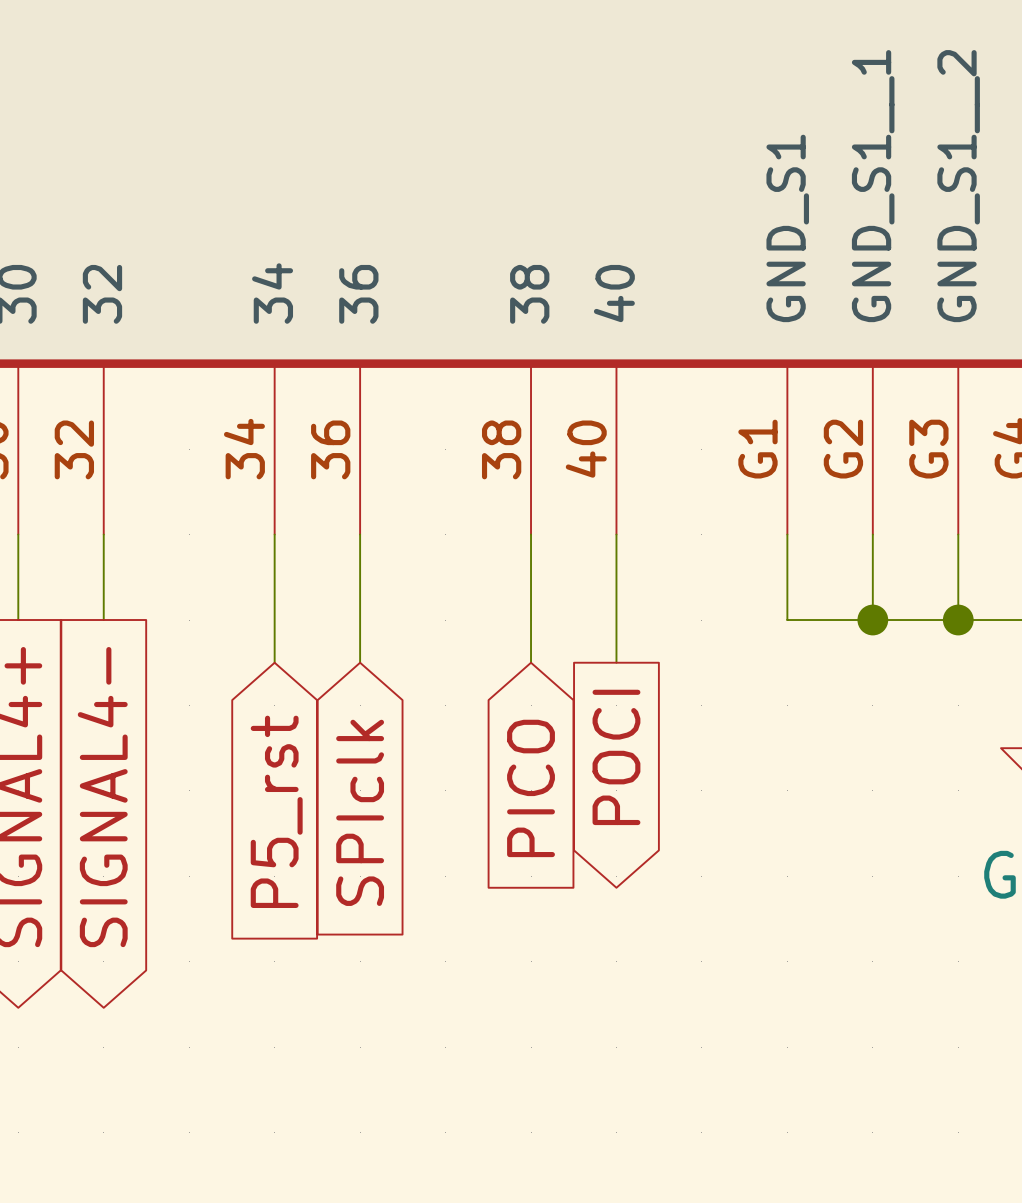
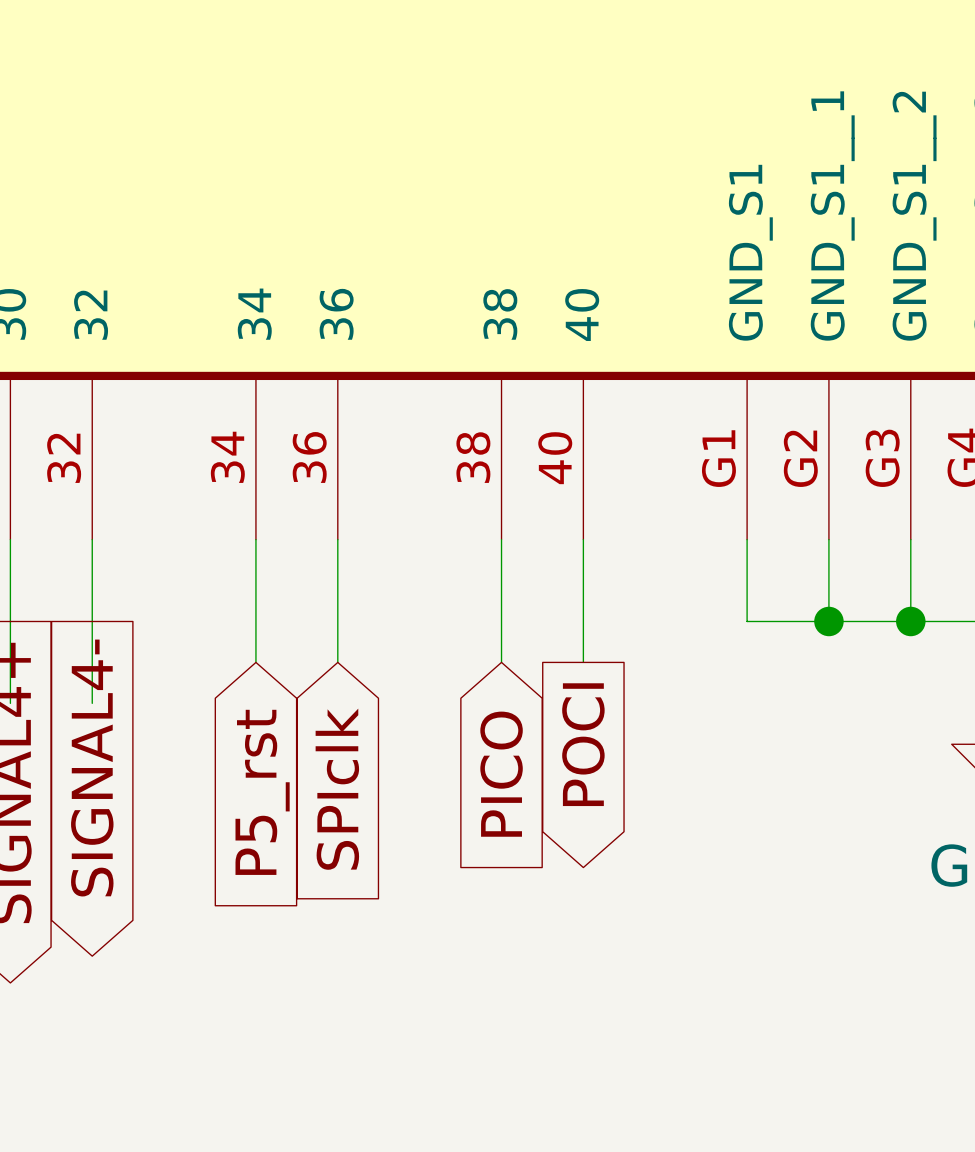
wire: none -> (10, 621) (10, 703)
wire: none -> (92, 621) (92, 703)

